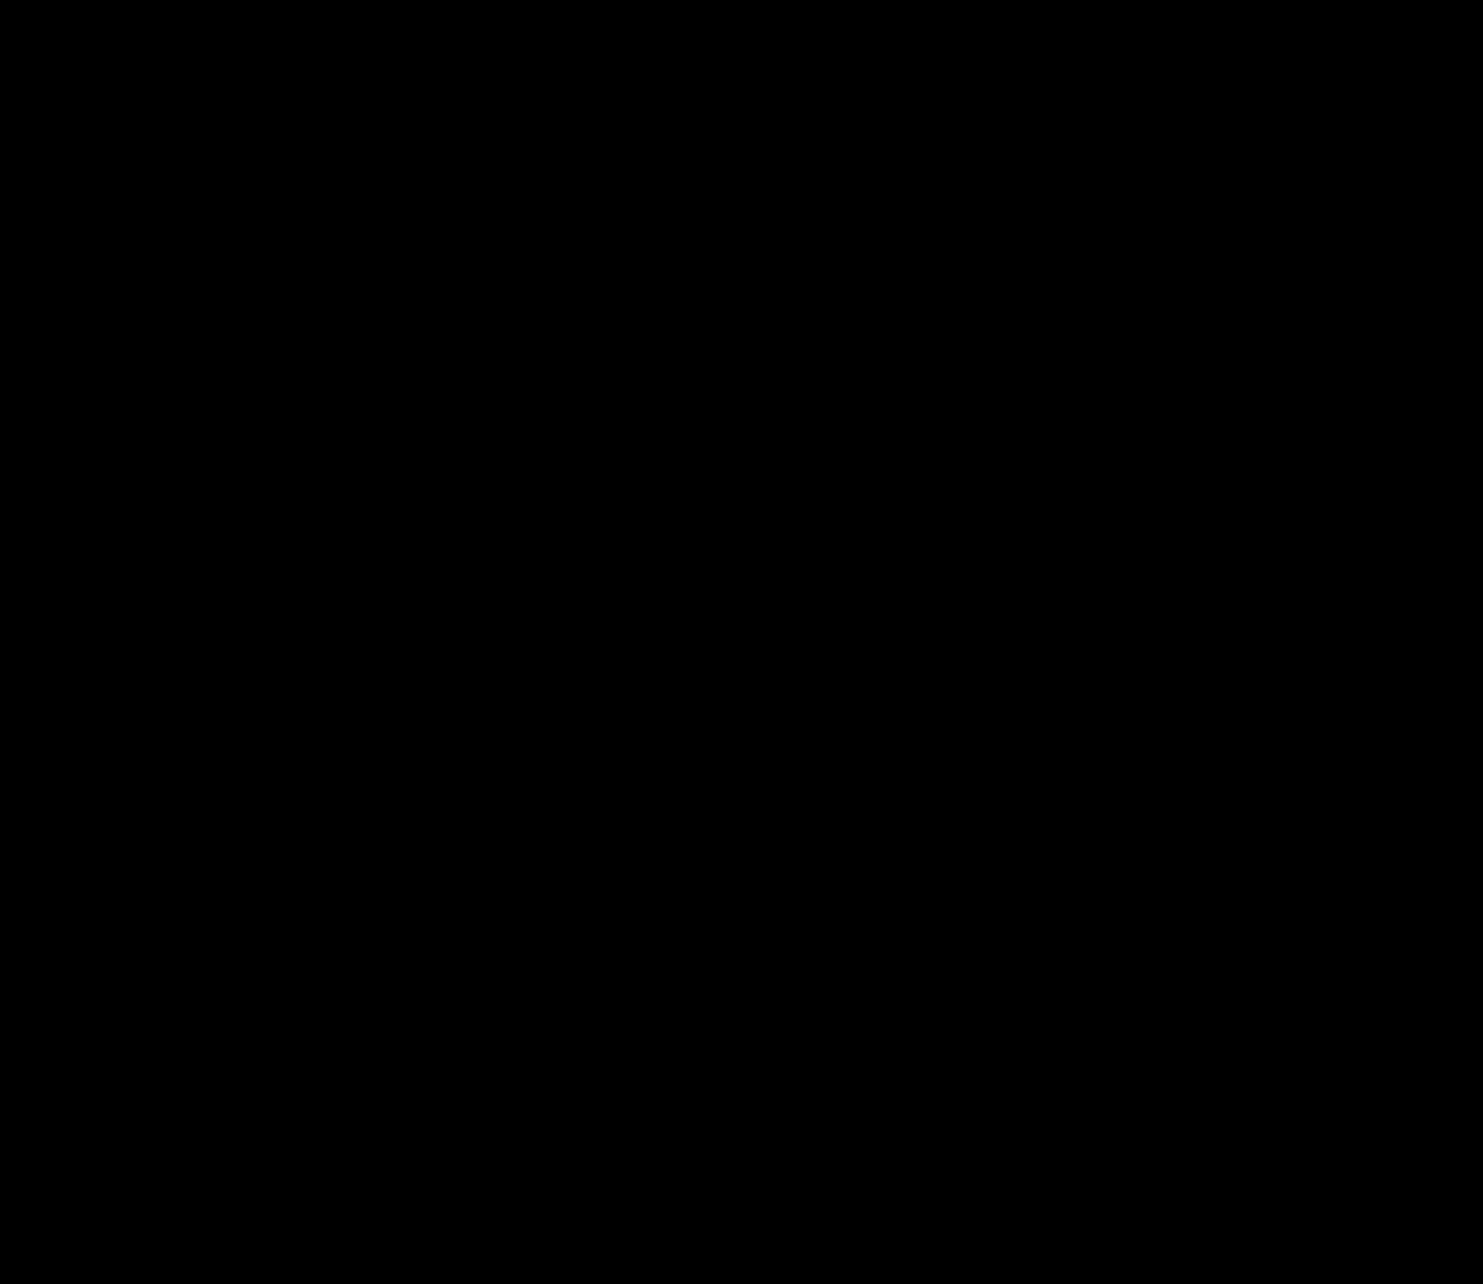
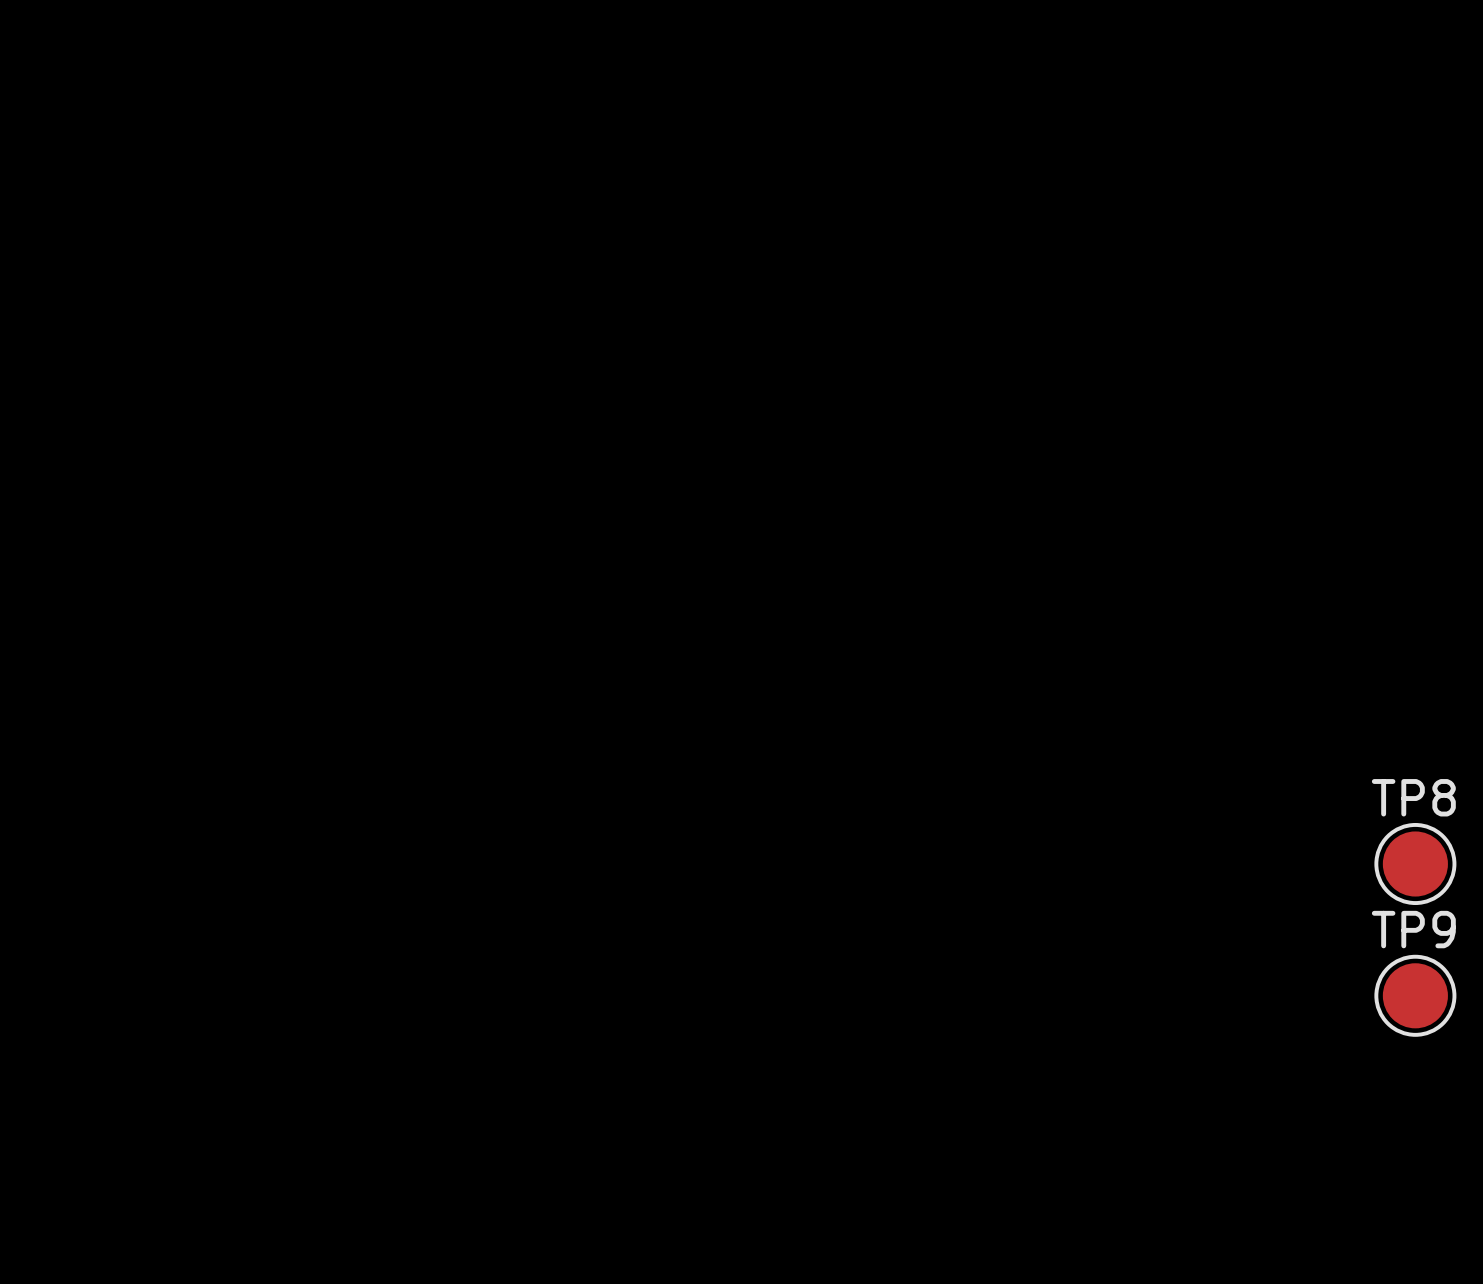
TP8: none -> (1415, 864)
TP9: none -> (1415, 995)

